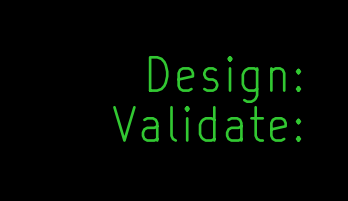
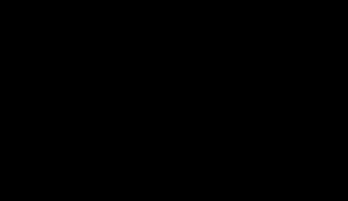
text: Design: (225, 79) -> none
text: Validate: (207, 123) -> none

